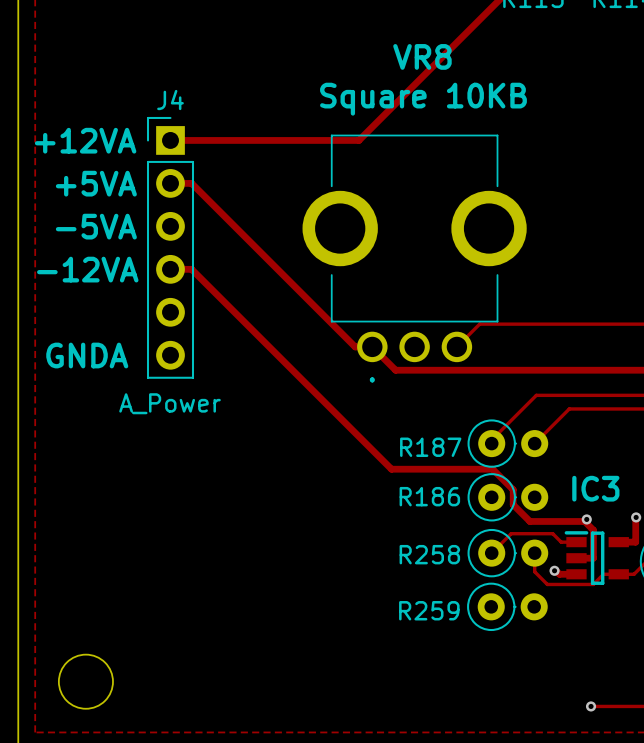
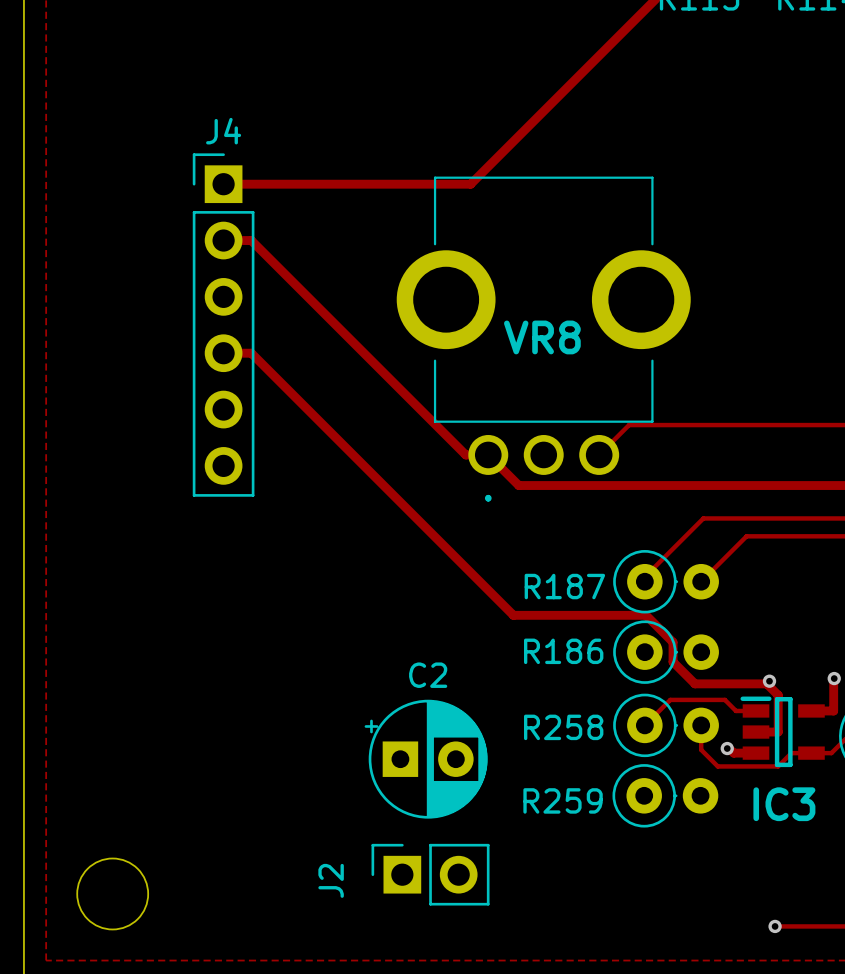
VR8 name position: VR8 (422, 56) -> VR8 (542, 337)
text: Square 10KB (423, 99) -> none
text: +12VA (85, 140) -> none
text: +5VA (96, 183) -> none
text: -5VA (96, 226) -> none
text: -12VA (87, 269) -> none
text: GNDA (87, 355) -> none
text: A_Power (170, 403) -> none
IC3 name position: IC3 (595, 488) -> IC3 (784, 804)
C2: none -> (426, 759)
J2: none -> (430, 874)

